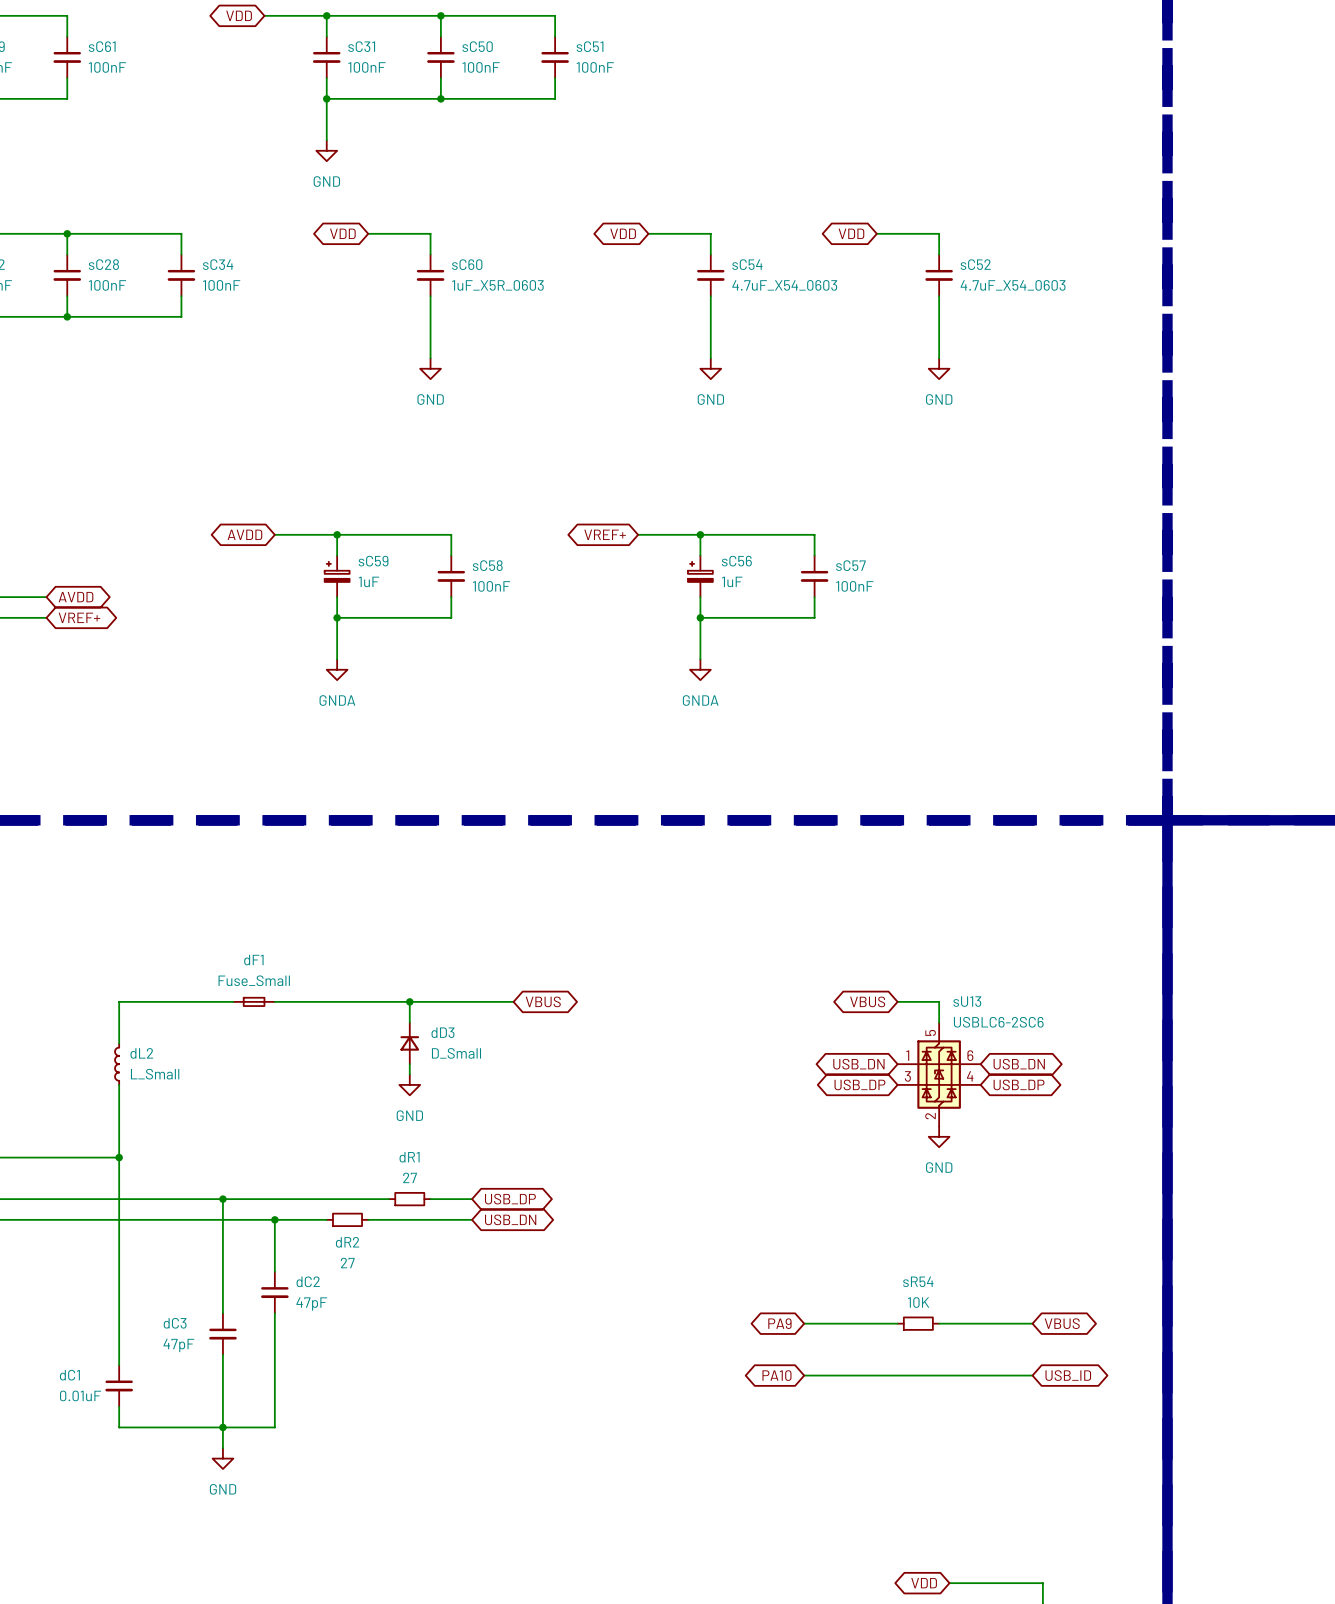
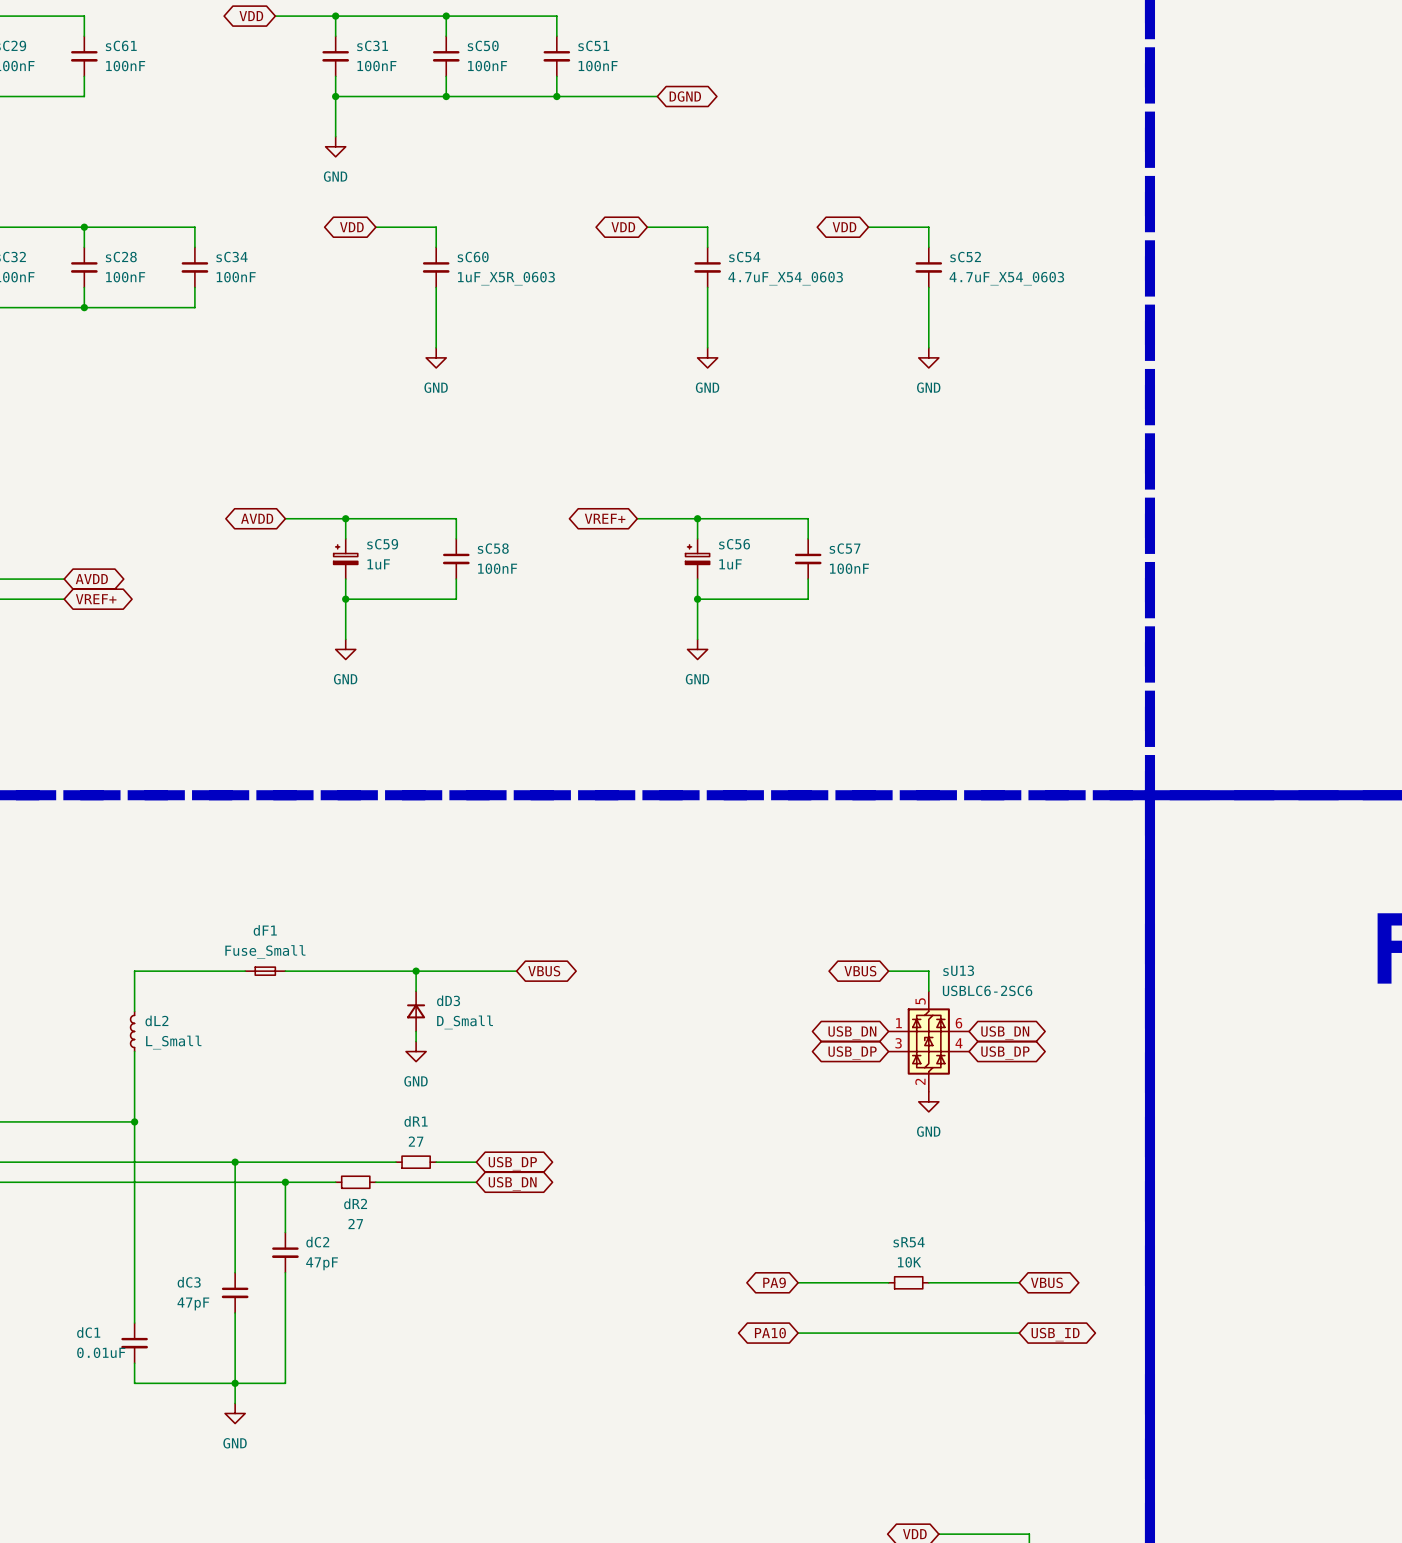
wire: none -> (556, 96) (657, 96)
junction: none -> (556, 96)
global label: none -> DGND (685, 96)
power symbol: GNDA (337, 669) -> GND (345, 649)
power symbol: GNDA (700, 669) -> GND (697, 649)

